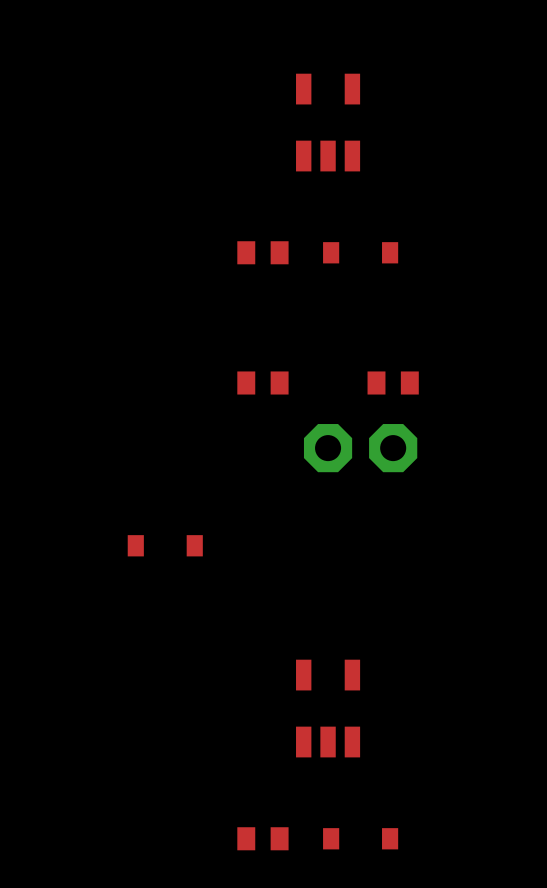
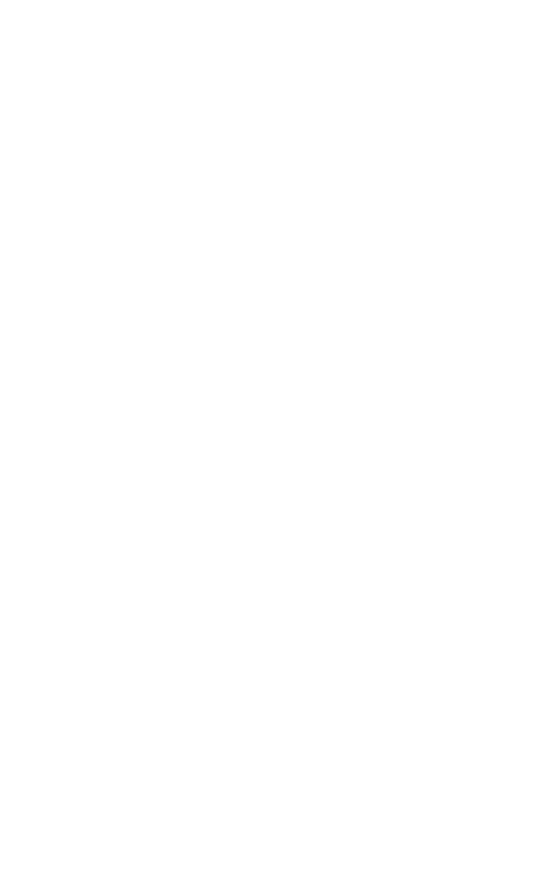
part: (328, 122) -> none
part: (262, 252) -> none
part: (360, 252) -> none
part: (262, 382) -> none
part: (393, 382) -> none
part: (360, 448) -> none
part: (165, 545) -> none
part: (328, 708) -> none
part: (262, 838) -> none
part: (360, 838) -> none

